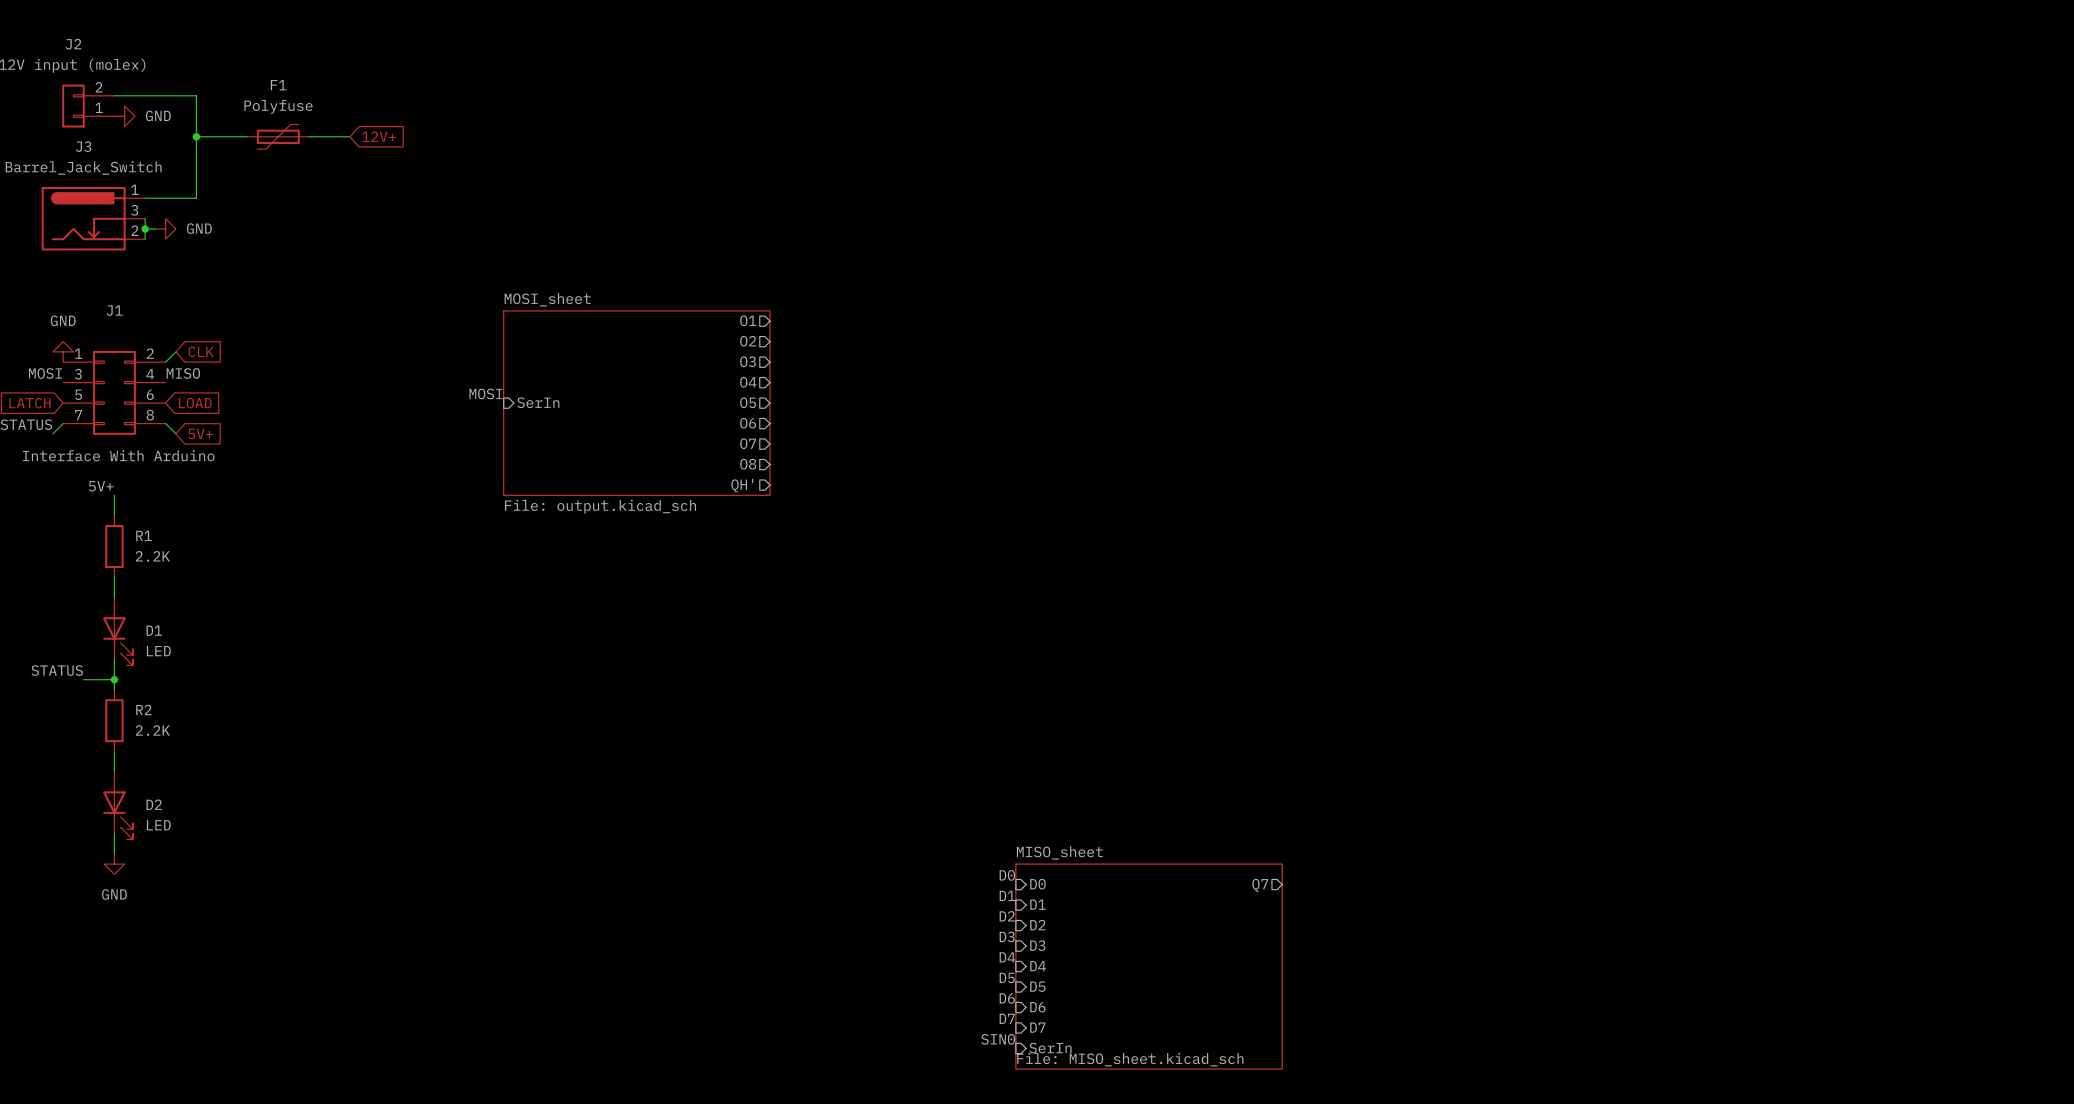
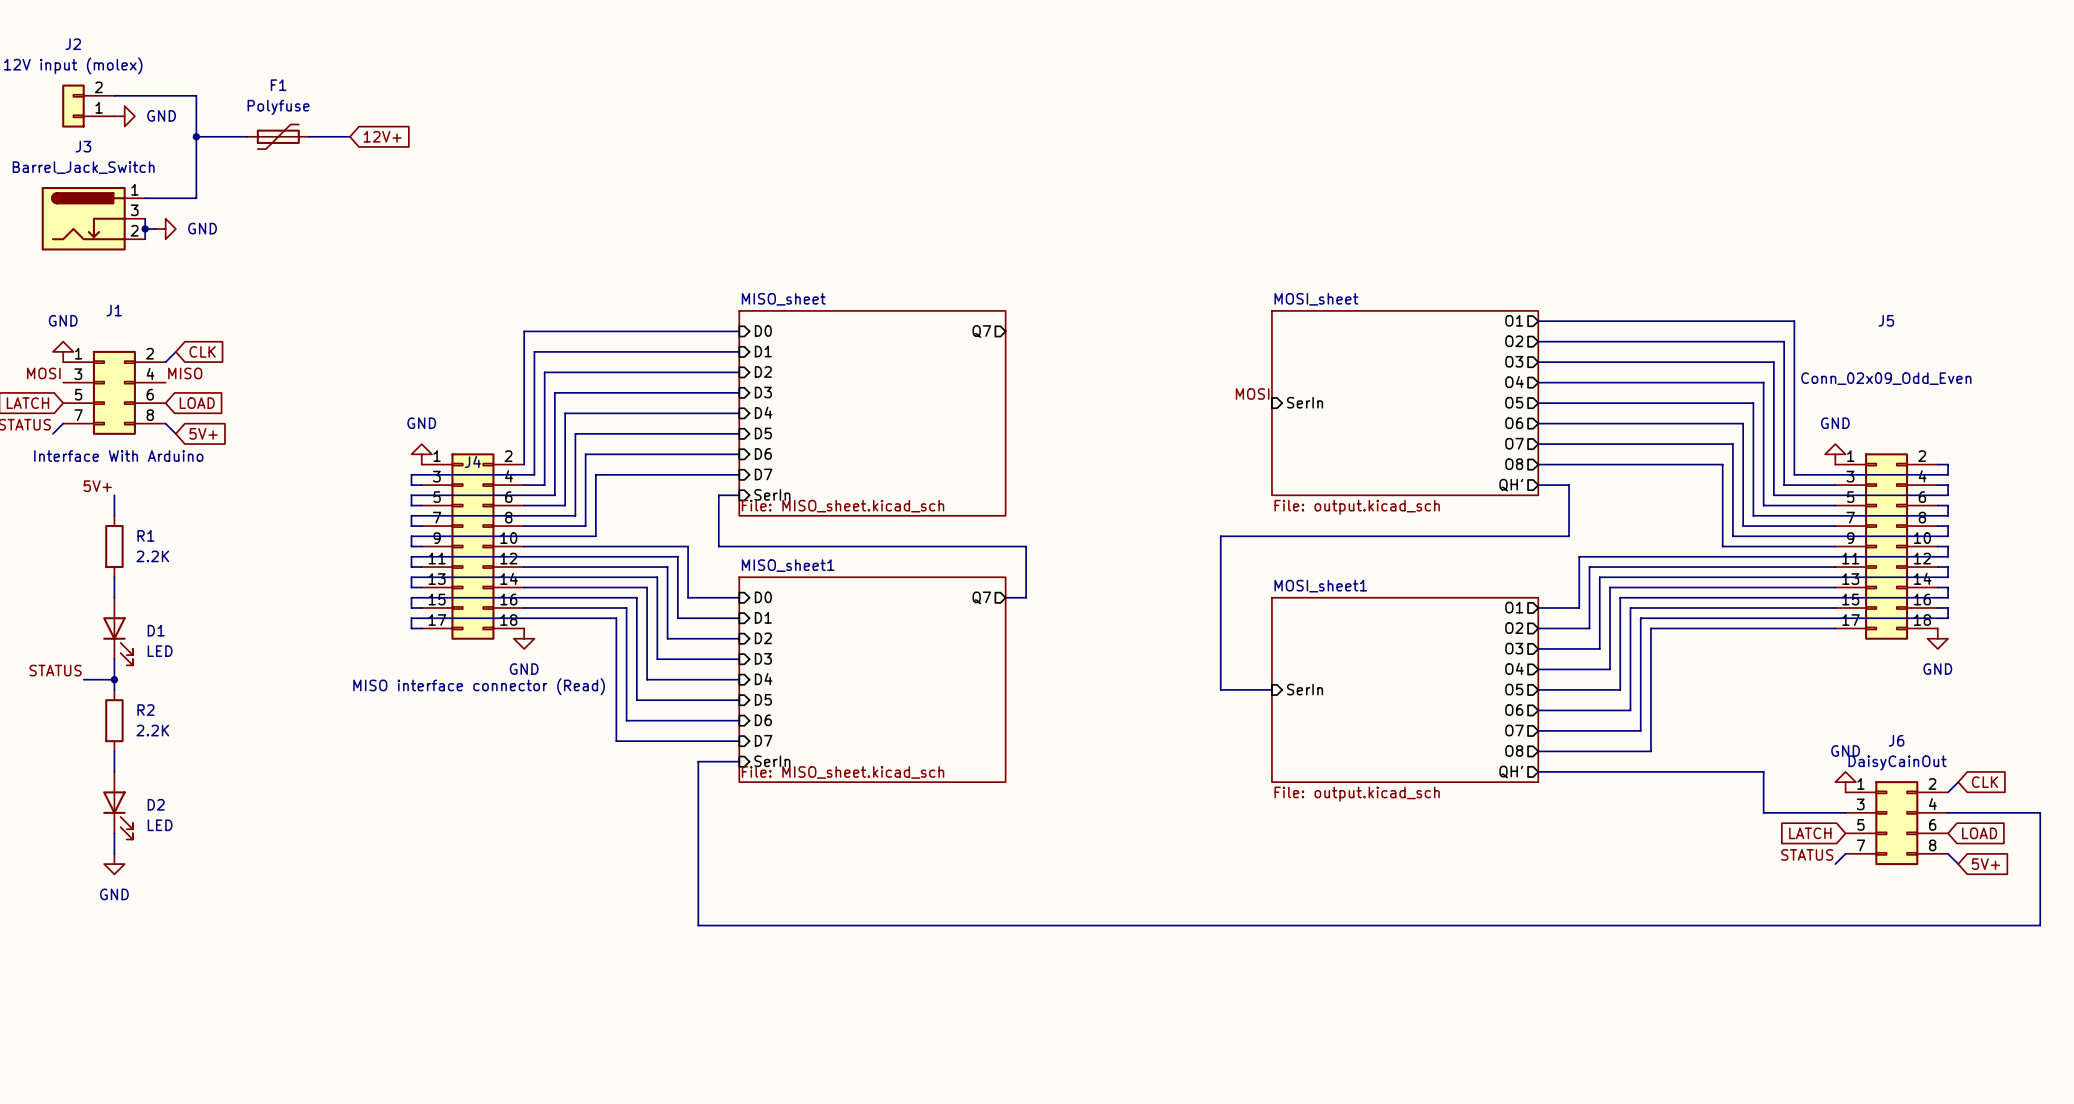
sheet pin: O1 (748, 320) -> none
sheet pin: none -> O1 (1514, 320)
wire: none -> (1538, 321) (1794, 321) (1794, 474) (1948, 474) (1948, 464) (1937, 464)
wire: none -> (739, 331) (524, 331) (524, 464)
sheet pin: none -> D0 (763, 331)
sheet pin: none -> Q7 (981, 331)
sheet pin: O2 (748, 341) -> none
sheet pin: none -> O2 (1514, 341)
wire: none -> (1538, 341) (1784, 341) (1784, 485) (1835, 485)
wire: none -> (739, 351) (534, 351) (534, 474) (411, 474) (411, 485) (421, 485)
sheet pin: none -> D1 (763, 351)
sheet pin: O3 (748, 361) -> none
sheet pin: none -> O3 (1514, 361)
wire: none -> (1538, 362) (1773, 362) (1773, 495) (1948, 495) (1948, 485) (1937, 485)
sheet pin: none -> D2 (763, 372)
wire: none -> (739, 372) (544, 372) (544, 485) (524, 485)
sheet pin: O4 (748, 382) -> none
sheet pin: none -> O4 (1514, 382)
wire: none -> (1538, 382) (1763, 382) (1763, 505) (1835, 505)
wire: none -> (739, 392) (554, 392) (554, 495) (411, 495) (411, 505) (421, 505)
sheet pin: none -> D3 (763, 392)
label: MOSI (485, 393) -> none
label: none -> MOSI (1252, 393)
sheet pin: SerIn (538, 402) -> none
sheet pin: O5 (748, 402) -> none
sheet pin: none -> SerIn (1305, 402)
sheet pin: none -> O5 (1514, 402)
sheet MOSI_sheet: File: output.kicad_sch (636, 403) -> none
sheet MOSI_sheet: none -> File: output.kicad_sch (1405, 403)
wire: none -> (1538, 403) (1753, 403) (1753, 515) (1948, 515) (1948, 505) (1937, 505)
sheet pin: none -> D4 (763, 412)
wire: none -> (739, 413) (565, 413) (565, 505) (524, 505)
sheet MISO_sheet: none -> File: MISO_sheet.kicad_sch (872, 413)
sheet pin: O6 (748, 423) -> none
sheet pin: none -> O6 (1514, 423)
wire: none -> (1538, 423) (1743, 423) (1743, 526) (1835, 526)
wire: none -> (739, 433) (575, 433) (575, 515) (411, 515) (411, 526) (421, 526)
sheet pin: none -> D5 (763, 433)
sheet pin: O7 (748, 443) -> none
sheet pin: none -> O7 (1514, 443)
wire: none -> (1538, 444) (1732, 444) (1732, 536) (1948, 536) (1948, 526) (1937, 526)
power symbol: none -> GND (421, 454)
wire: none -> (739, 454) (585, 454) (585, 526) (524, 526)
sheet pin: none -> D6 (763, 453)
power symbol: none -> GND (1835, 454)
sheet pin: O8 (748, 464) -> none
sheet pin: none -> O8 (1514, 464)
wire: none -> (1538, 464) (1722, 464) (1722, 546) (1835, 546)
wire: none -> (739, 474) (595, 474) (595, 536) (411, 536) (411, 546) (421, 546)
sheet pin: none -> D7 (763, 474)
sheet pin: QH' (742, 485) -> none
sheet pin: none -> QH' (1511, 485)
wire: none -> (1538, 485) (1569, 485) (1569, 536) (1220, 536) (1220, 689) (1271, 689)
sheet pin: none -> SerIn (772, 494)
wire: none -> (739, 495) (718, 495) (718, 546) (1026, 546) (1026, 597) (1005, 597)
J4: none -> MISO interface connector (Read) (472, 546)
wire: none -> (524, 546) (688, 546) (688, 597) (739, 597)
J5: none -> Conn_02x09_Odd_Even (1886, 546)
wire: none -> (1937, 546) (1948, 546) (1948, 556) (1579, 556) (1579, 607) (1538, 607)
wire: none -> (421, 567) (411, 567) (411, 556) (677, 556) (677, 618) (739, 618)
wire: none -> (524, 567) (667, 567) (667, 638) (739, 638)
wire: none -> (1835, 567) (1589, 567) (1589, 628) (1538, 628)
wire: none -> (1937, 567) (1948, 567) (1948, 577) (1599, 577) (1599, 648) (1538, 648)
wire: none -> (421, 587) (411, 587) (411, 577) (657, 577) (657, 659) (739, 659)
wire: none -> (524, 587) (647, 587) (647, 679) (739, 679)
wire: none -> (1835, 587) (1609, 587) (1609, 669) (1538, 669)
wire: none -> (1937, 587) (1948, 587) (1948, 597) (1620, 597) (1620, 689) (1538, 689)
sheet pin: none -> D0 (763, 597)
sheet pin: none -> Q7 (981, 597)
wire: none -> (421, 607) (411, 607) (411, 597) (636, 597) (636, 700) (739, 700)
wire: none -> (524, 607) (626, 607) (626, 720) (739, 720)
sheet pin: none -> O1 (1514, 607)
wire: none -> (1835, 607) (1630, 607) (1630, 710) (1538, 710)
wire: none -> (1937, 607) (1948, 607) (1948, 618) (1640, 618) (1640, 730) (1538, 730)
sheet pin: none -> D1 (763, 617)
wire: none -> (421, 628) (411, 628) (411, 618) (616, 618) (616, 741) (739, 741)
sheet pin: none -> O2 (1514, 628)
wire: none -> (1835, 628) (1650, 628) (1650, 751) (1538, 751)
power symbol: none -> GND (524, 638)
sheet pin: none -> D2 (763, 638)
power symbol: none -> GND (1937, 638)
sheet pin: none -> O3 (1514, 648)
sheet pin: none -> D3 (763, 658)
sheet pin: none -> O4 (1514, 668)
sheet pin: none -> D4 (763, 679)
sheet MISO_sheet1: none -> File: MISO_sheet.kicad_sch (872, 679)
sheet pin: none -> SerIn (1305, 689)
sheet MOSI_sheet1: none -> File: output.kicad_sch (1405, 689)
sheet pin: none -> O5 (1514, 689)
sheet pin: none -> D5 (763, 699)
sheet pin: none -> O6 (1514, 710)
sheet pin: none -> D6 (763, 720)
sheet pin: none -> O7 (1514, 730)
sheet pin: none -> D7 (763, 740)
sheet pin: none -> O8 (1514, 751)
wire: none -> (739, 761) (698, 761) (698, 925) (2040, 925) (2040, 812) (1948, 812)
sheet pin: none -> SerIn (772, 761)
wire: none -> (1538, 771) (1763, 771) (1763, 812) (1845, 812)
sheet pin: none -> QH' (1511, 772)
power symbol: none -> GND (1845, 782)
wire: none -> (1958, 782) (1948, 792)
global label: none -> CLK (1985, 782)
J6: none -> DaisyCainOut (1896, 823)
global label: none -> LATCH (1810, 833)
global label: none -> LOAD (1979, 833)
wire: none -> (1845, 853) (1835, 864)
wire: none -> (1948, 853) (1958, 864)
label: none -> STATUS (1807, 854)
global label: none -> 5V+ (1985, 864)
label: D0 (1007, 875) -> none
sheet pin: D0 (1037, 884) -> none
sheet pin: Q7 (1260, 885) -> none
label: D1 (1007, 895) -> none
sheet pin: D1 (1038, 904) -> none
label: D2 (1007, 916) -> none
sheet pin: D2 (1037, 925) -> none
label: D3 (1007, 936) -> none
sheet pin: D3 (1037, 945) -> none
label: D4 (1007, 957) -> none
sheet pin: D4 (1038, 966) -> none
sheet MISO_sheet: File: MISO_sheet.kicad_sch (1149, 966) -> none
label: D5 (1007, 977) -> none
sheet pin: D5 (1037, 986) -> none
label: D6 (1007, 998) -> none
sheet pin: D6 (1037, 1007) -> none
label: D7 (1007, 1018) -> none
sheet pin: D7 (1037, 1027) -> none
label: SIN0 (998, 1039) -> none
sheet pin: SerIn (1050, 1048) -> none

